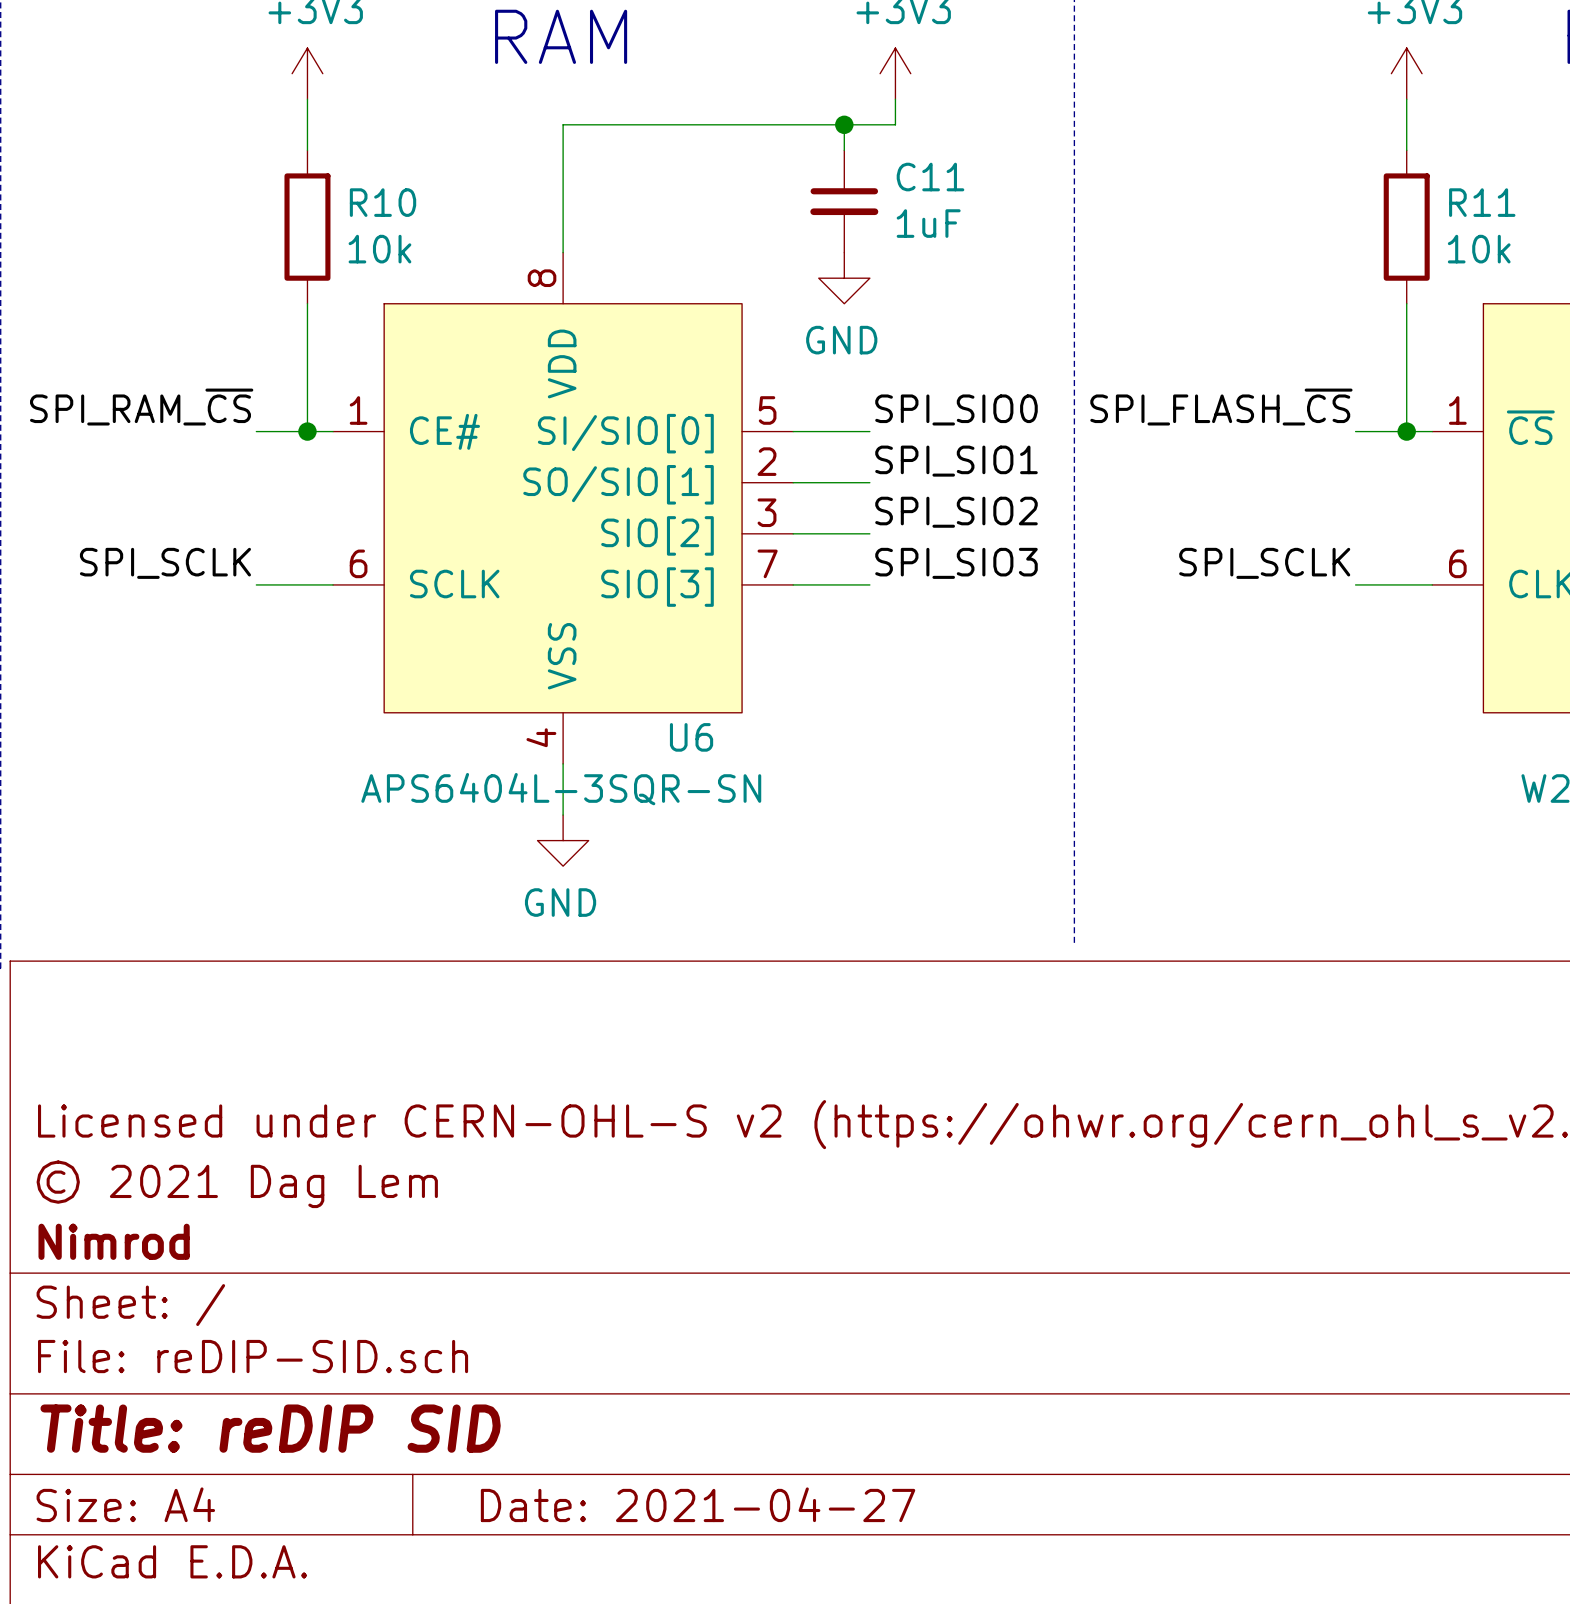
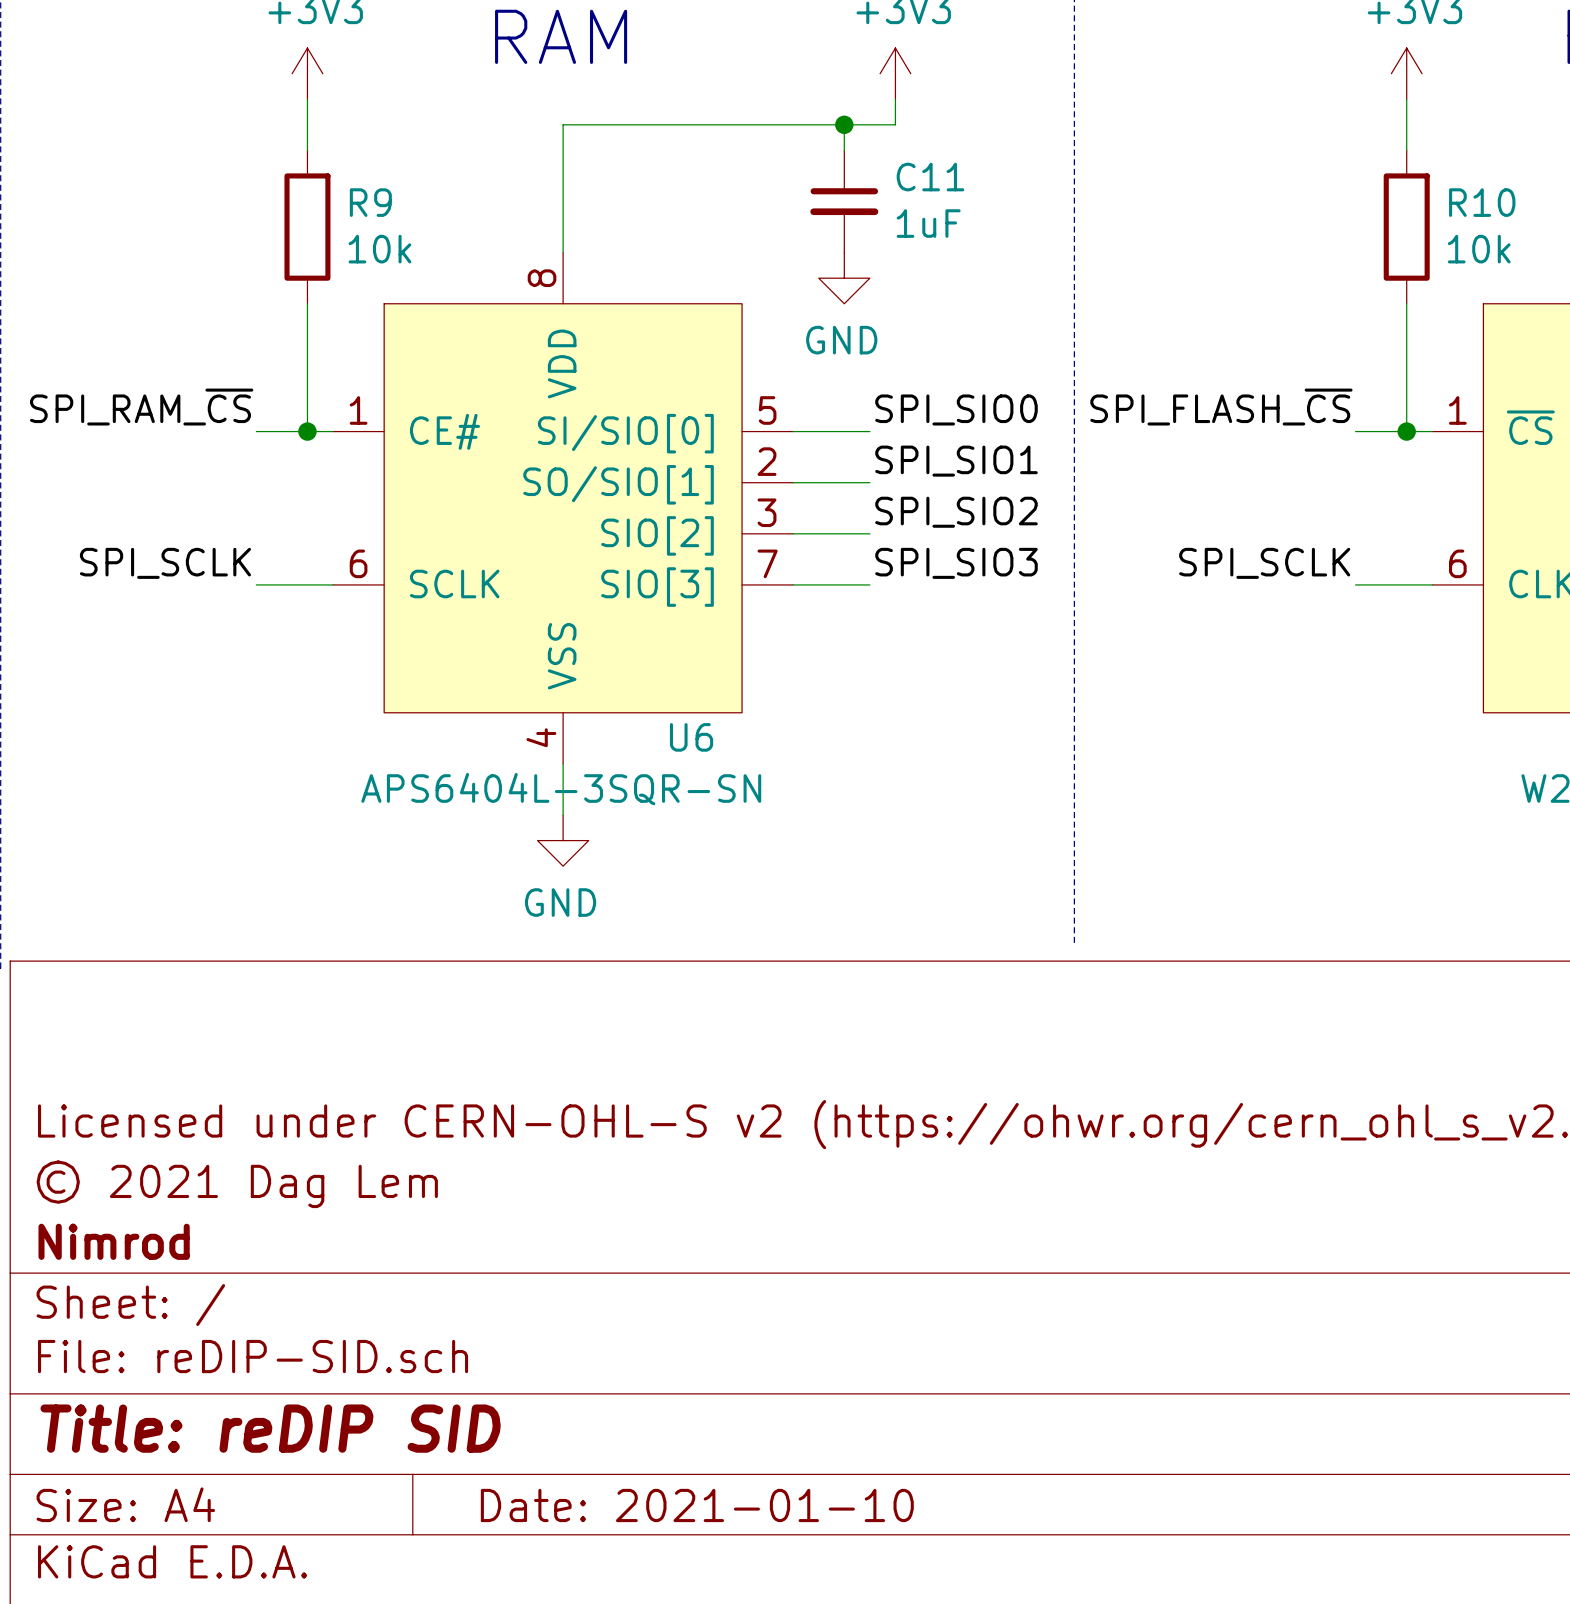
R10 name: R10 (383, 202) -> R9 (370, 202)
R11 name: R11 (1482, 202) -> R10 (1482, 202)
title block: Date: 2021-04-27 (698, 1504) -> Date: 2021-01-10 (697, 1505)

